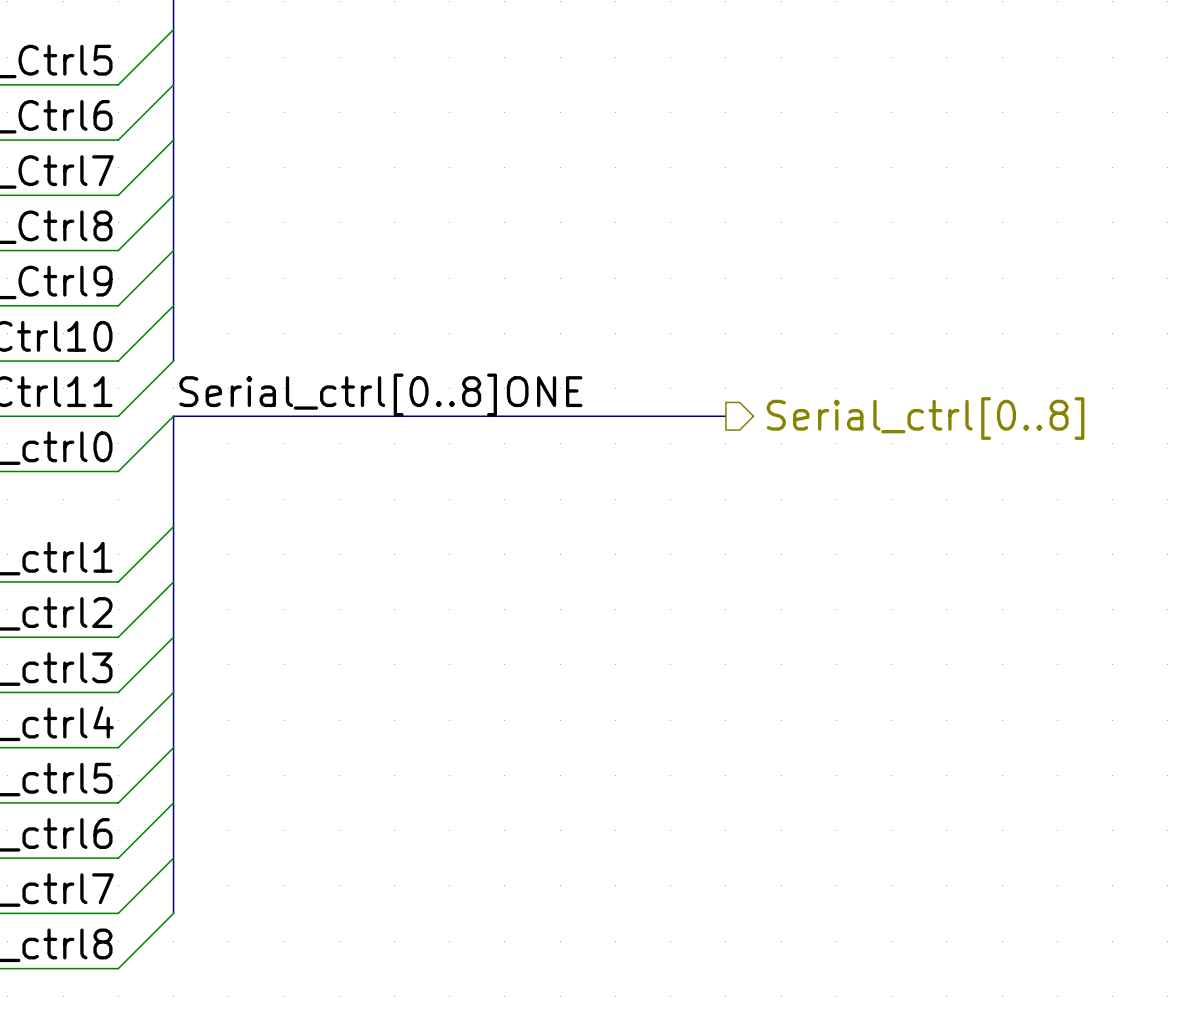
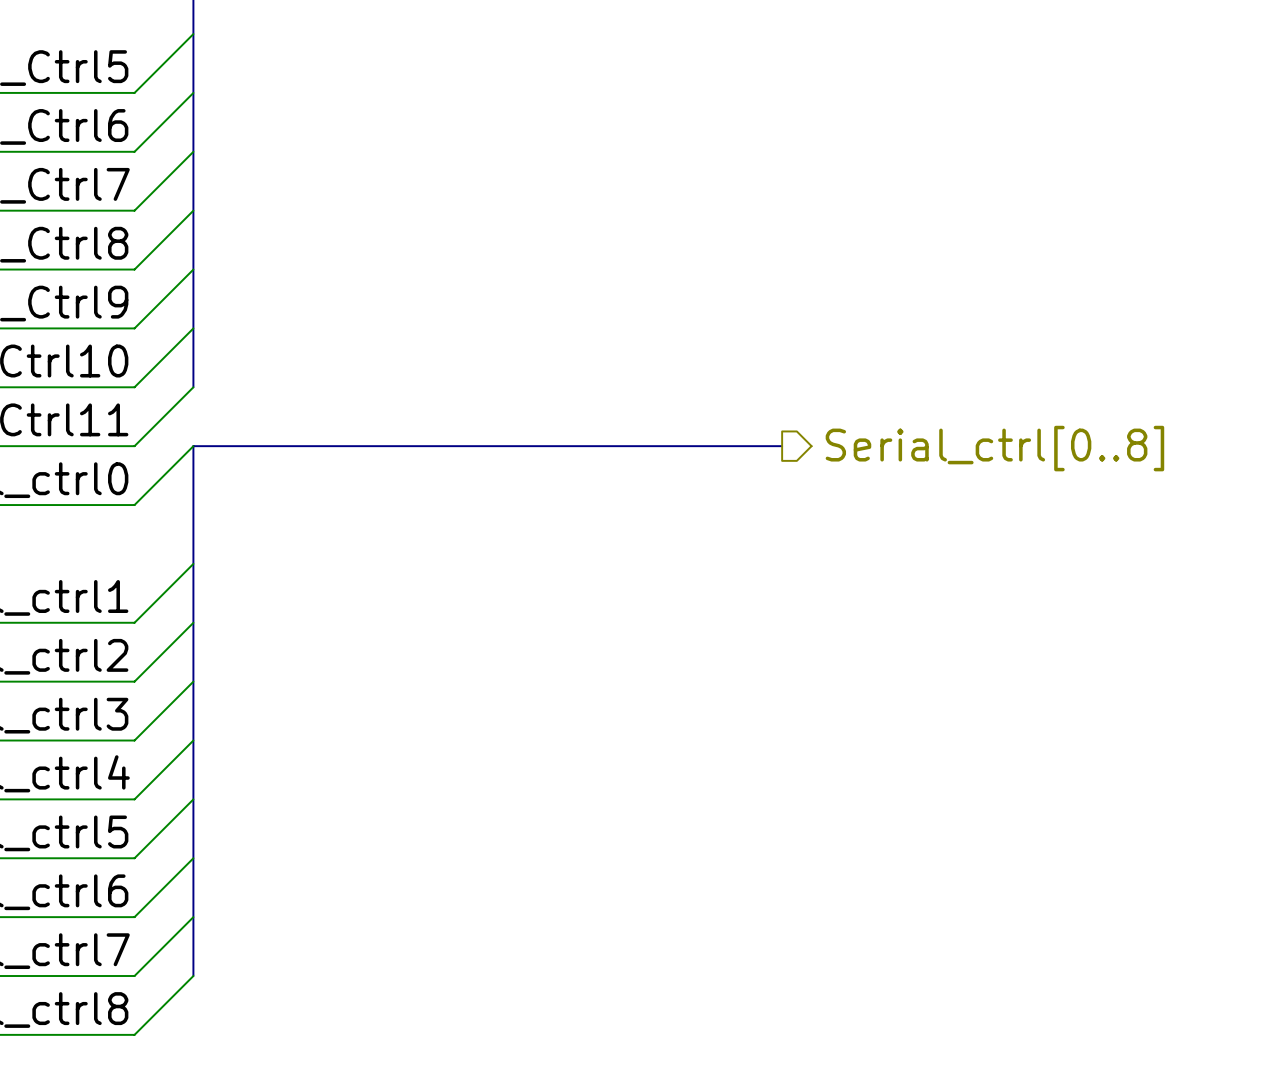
label: Serial_ctrl[0..8]ONE (380, 394) -> none

